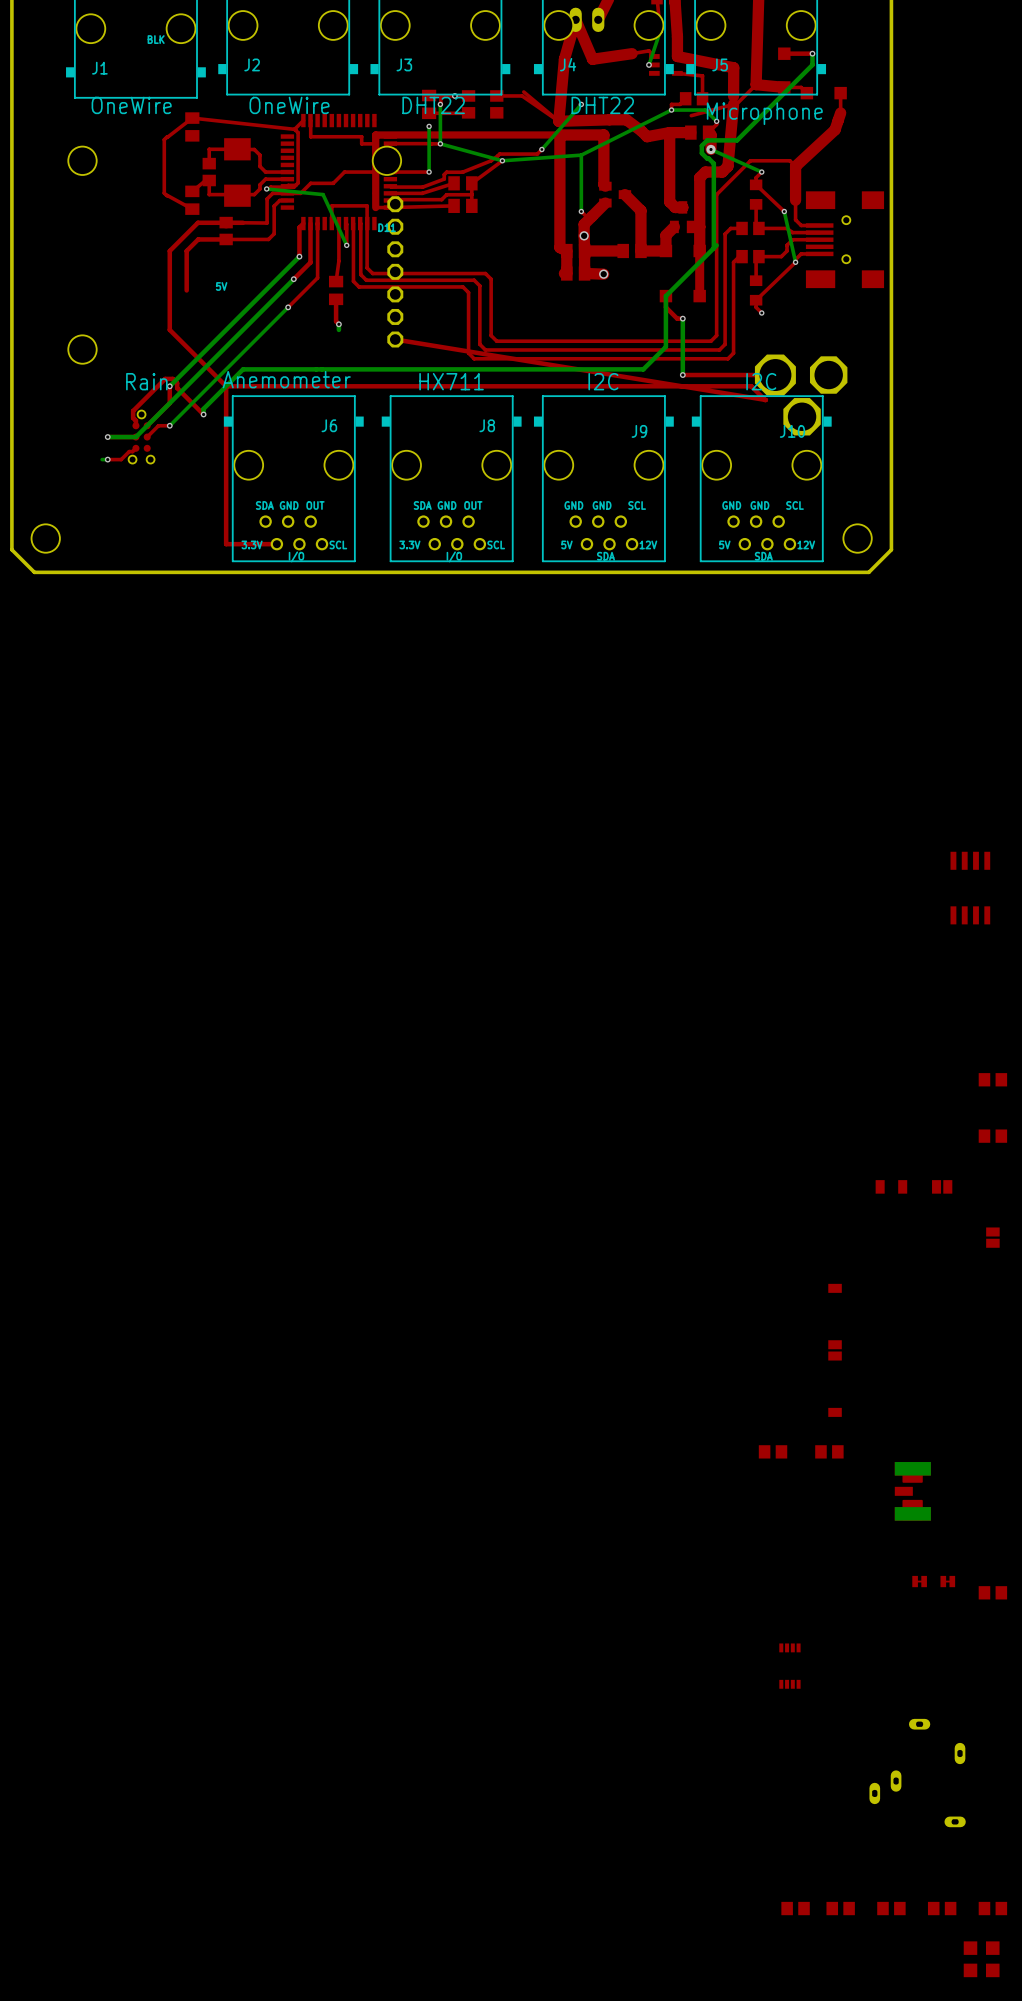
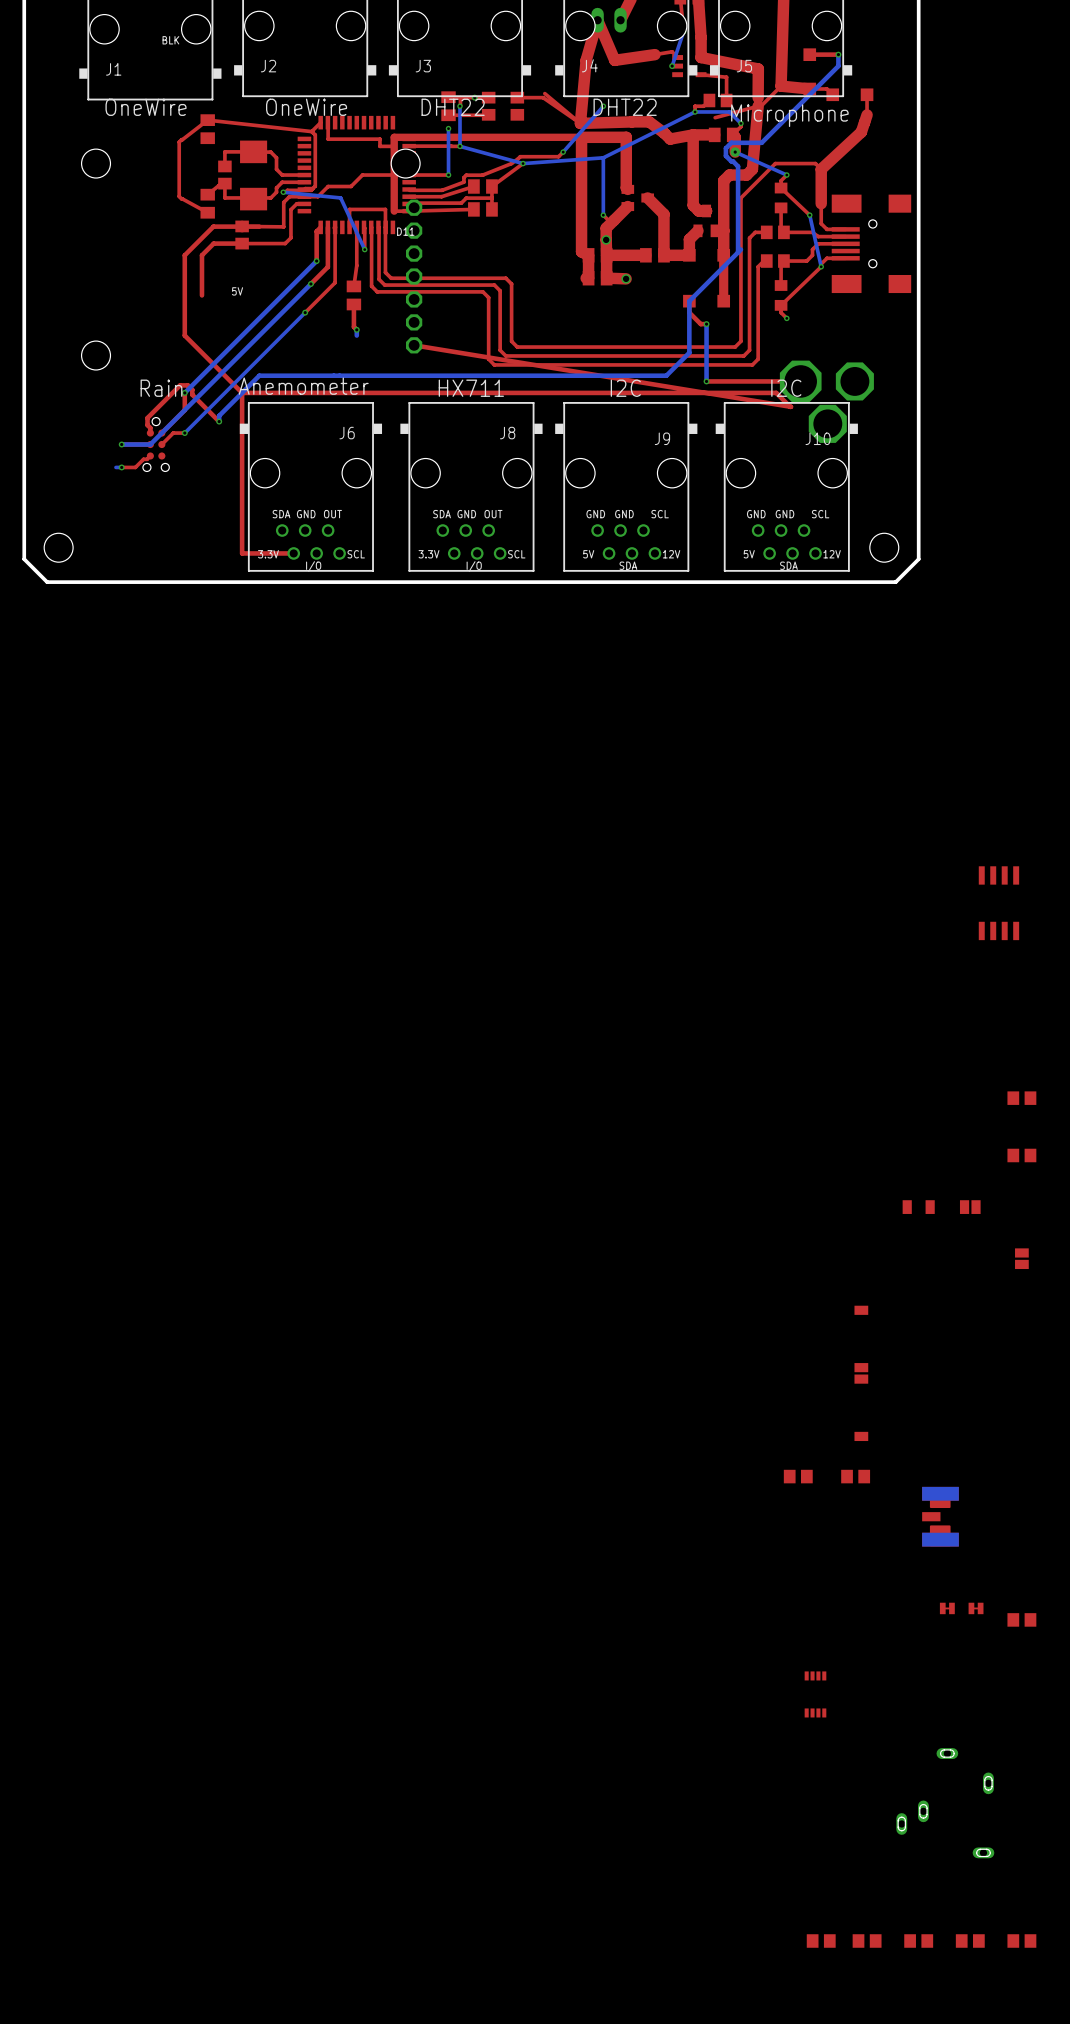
part: (981, 1959) -> none

